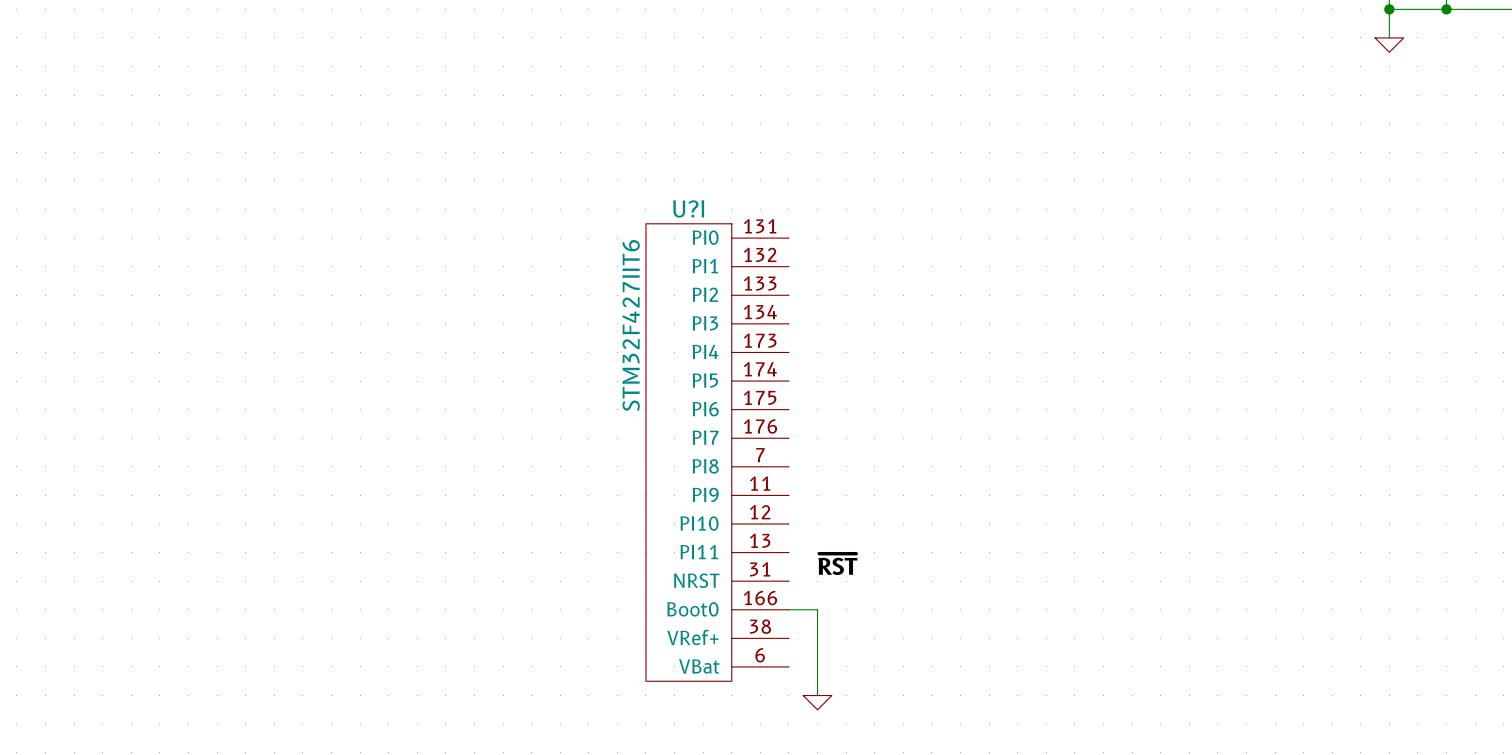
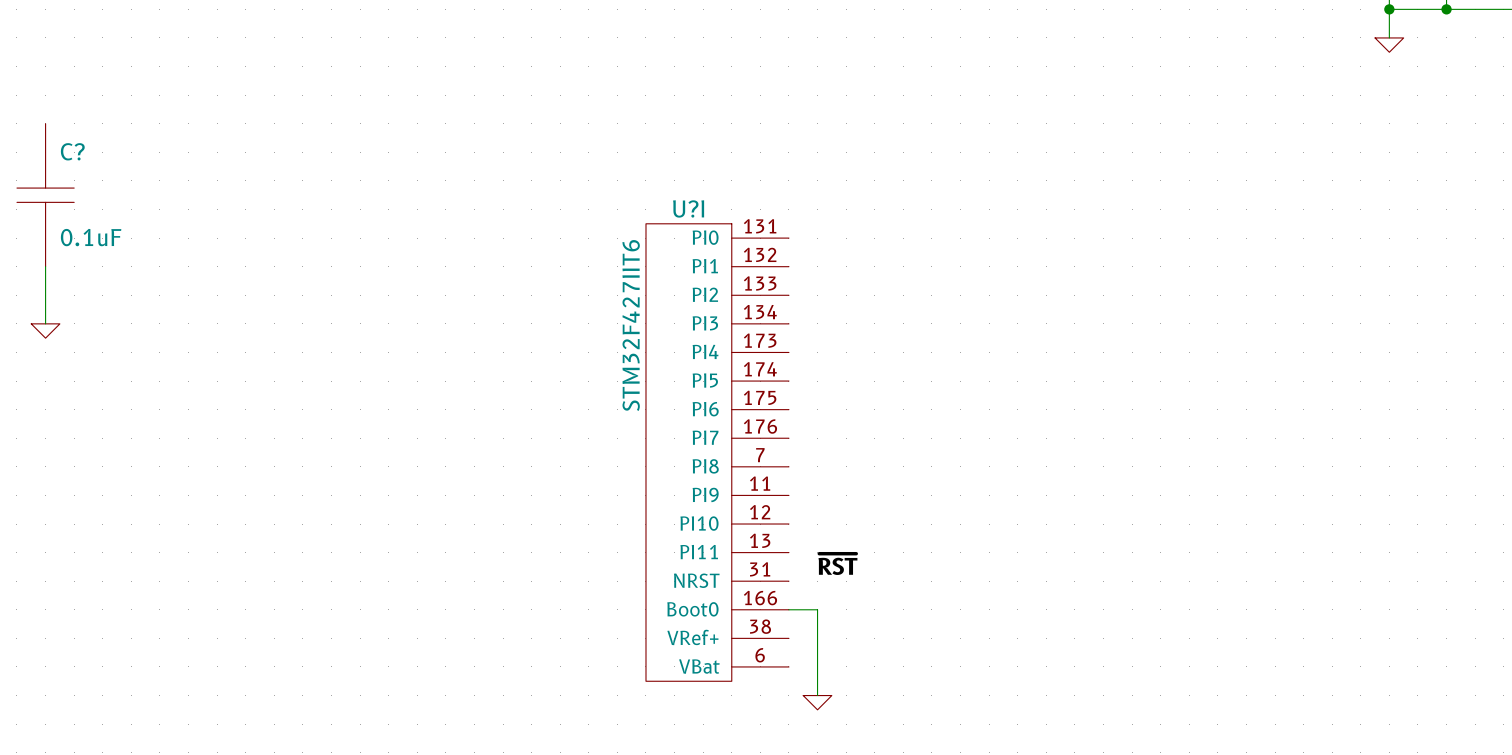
C?: none -> 0.1uF (45, 195)
wire: none -> (45, 266) (45, 323)
power symbol: none -> (45, 331)

